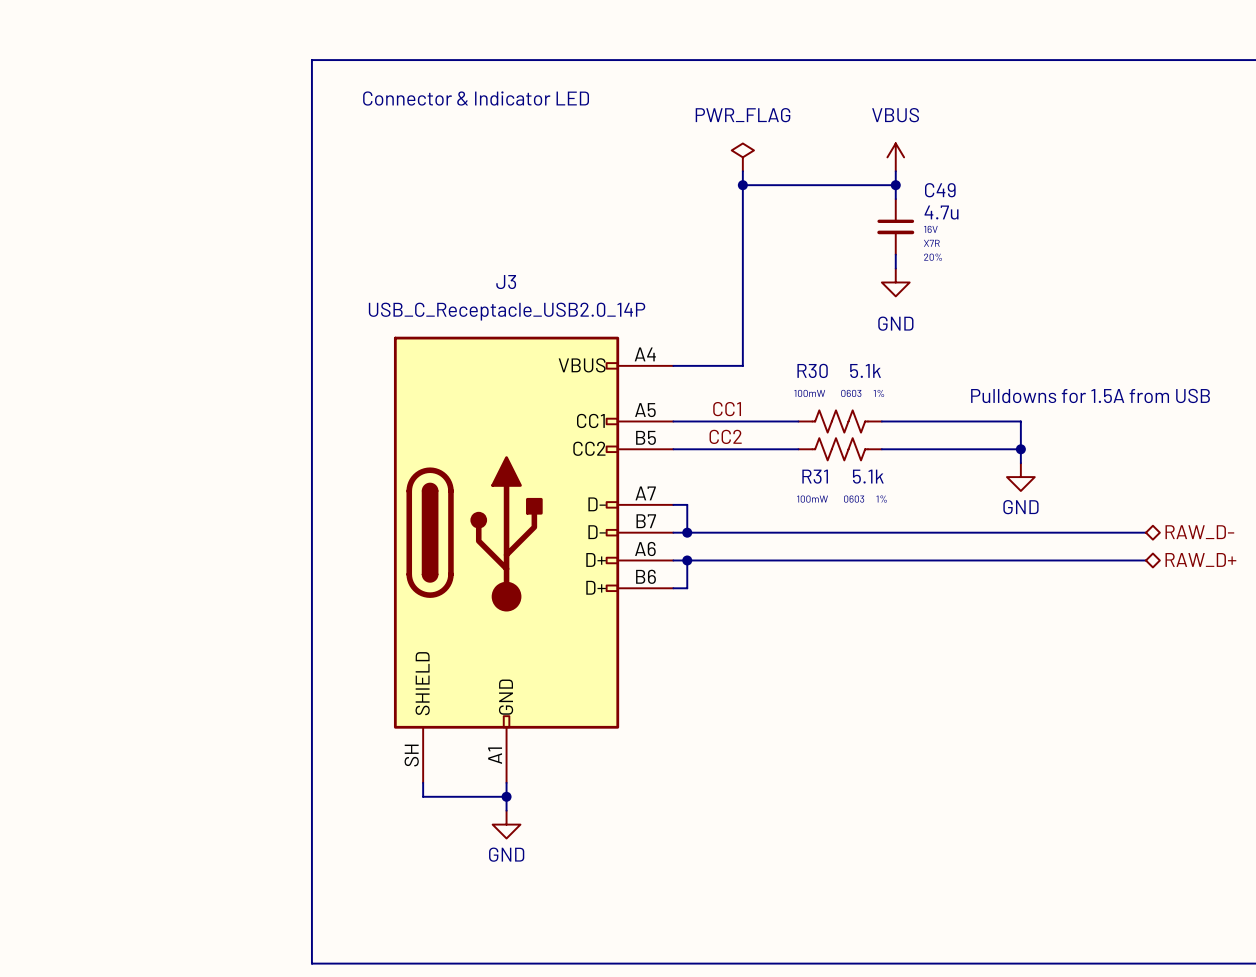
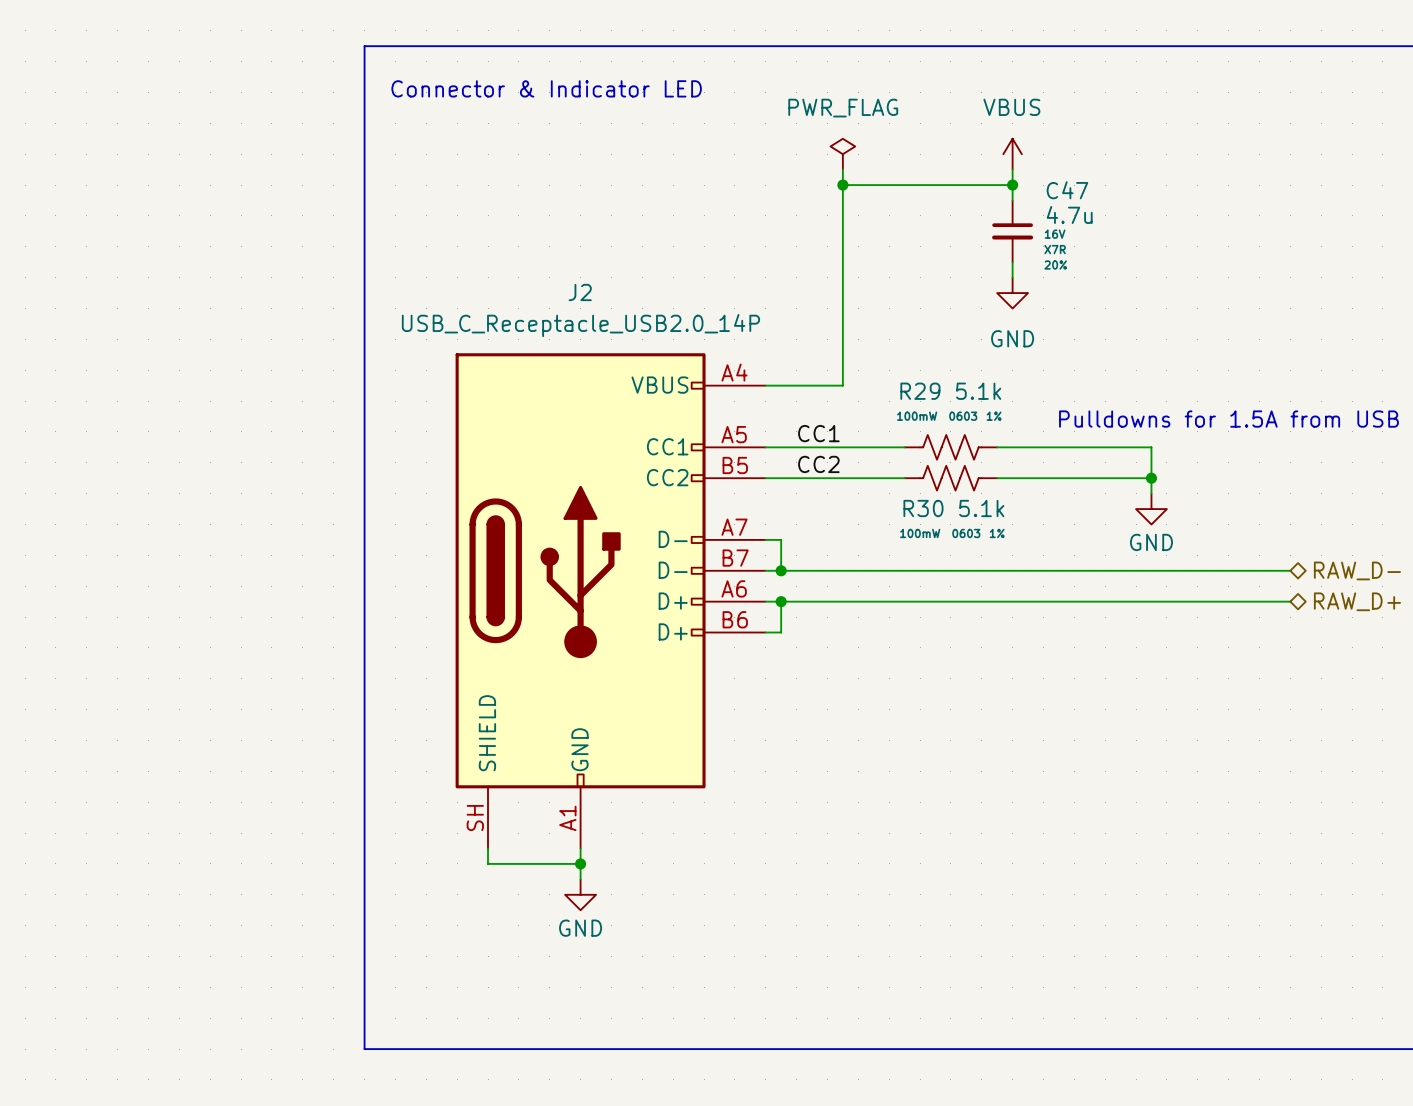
C49 name: C49 (940, 190) -> C47 (1067, 190)
J3 name: J3 (506, 282) -> J2 (580, 292)
R30 name: R30 (812, 370) -> R29 (920, 391)
R31 name: R31 (815, 476) -> R30 (923, 508)

